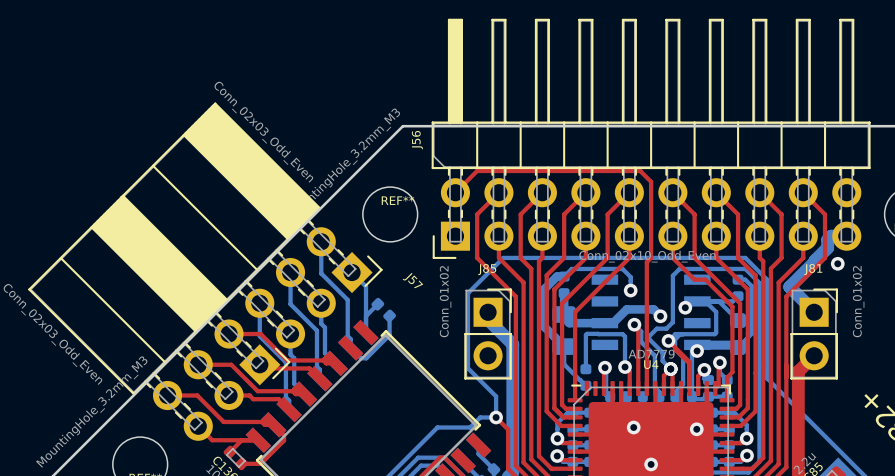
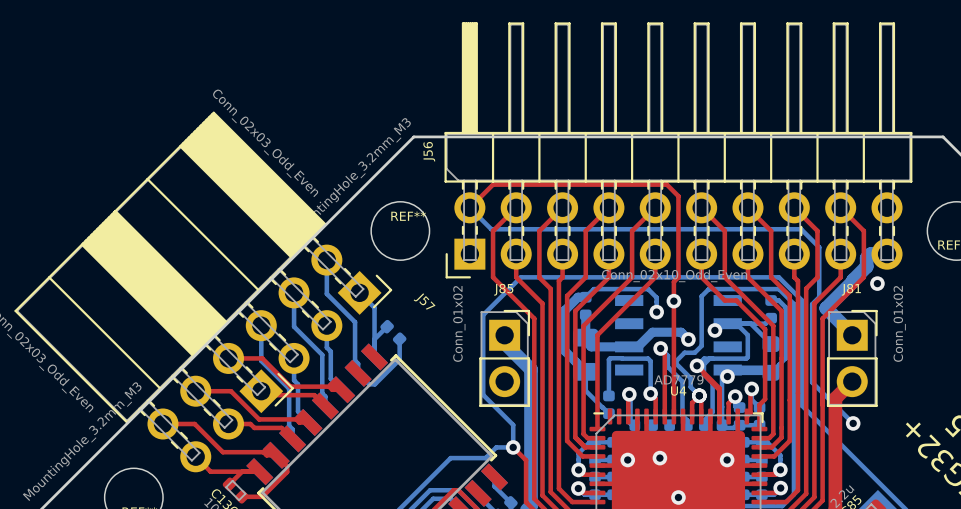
bottom track: none -> (469, 207) (491, 229) (801, 229) (819, 247) (819, 297) (812, 304) (812, 382) (853, 423)
via: none -> (673, 301)
via: none -> (853, 423)
via: none -> (627, 460)

